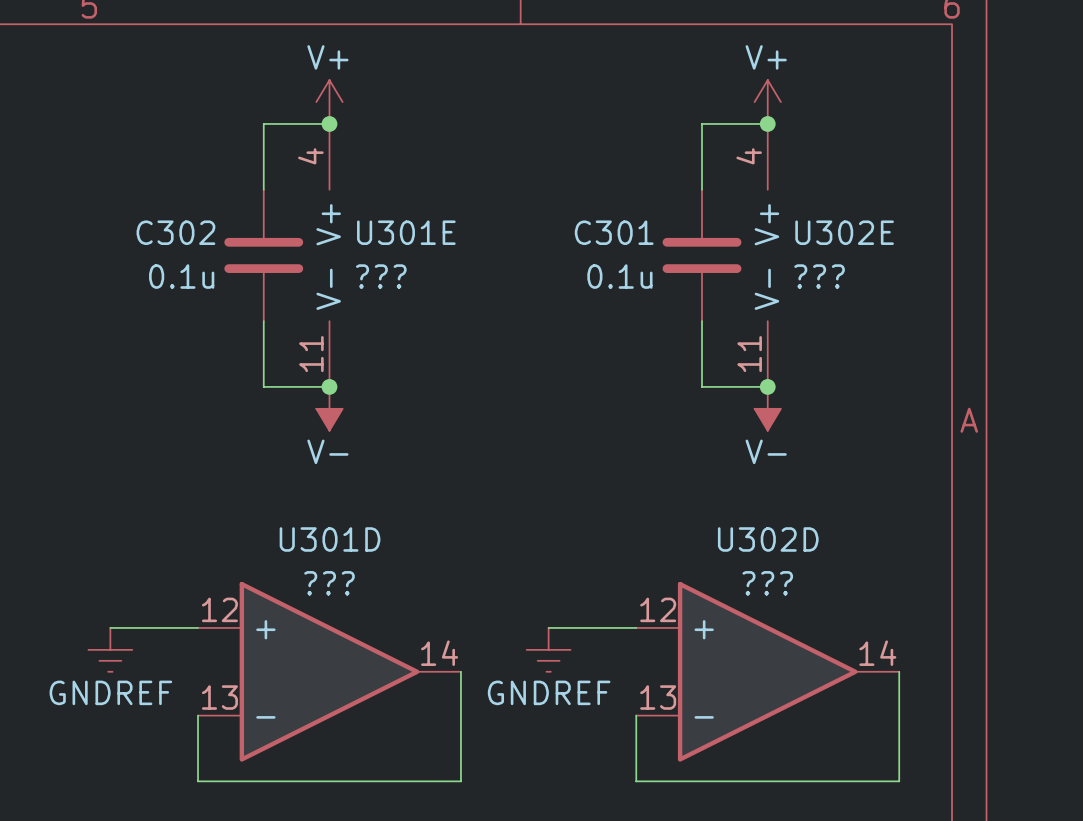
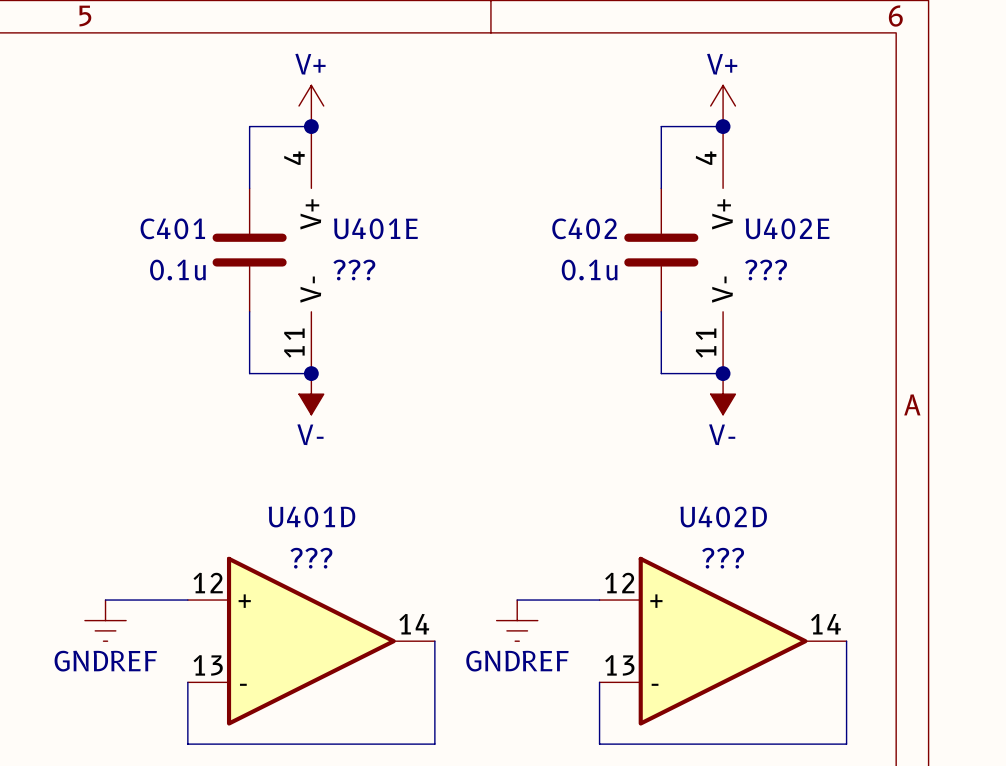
C302 name: C302 (175, 232) -> C401 (172, 228)
U301E name: U301E (406, 232) -> U401E (375, 228)
C301 name: C301 (614, 232) -> C402 (584, 228)
U302E name: U302E (844, 232) -> U402E (787, 228)
U301D name: U301D (330, 539) -> U401D (311, 517)
U302D name: U302D (768, 539) -> U402D (723, 517)

